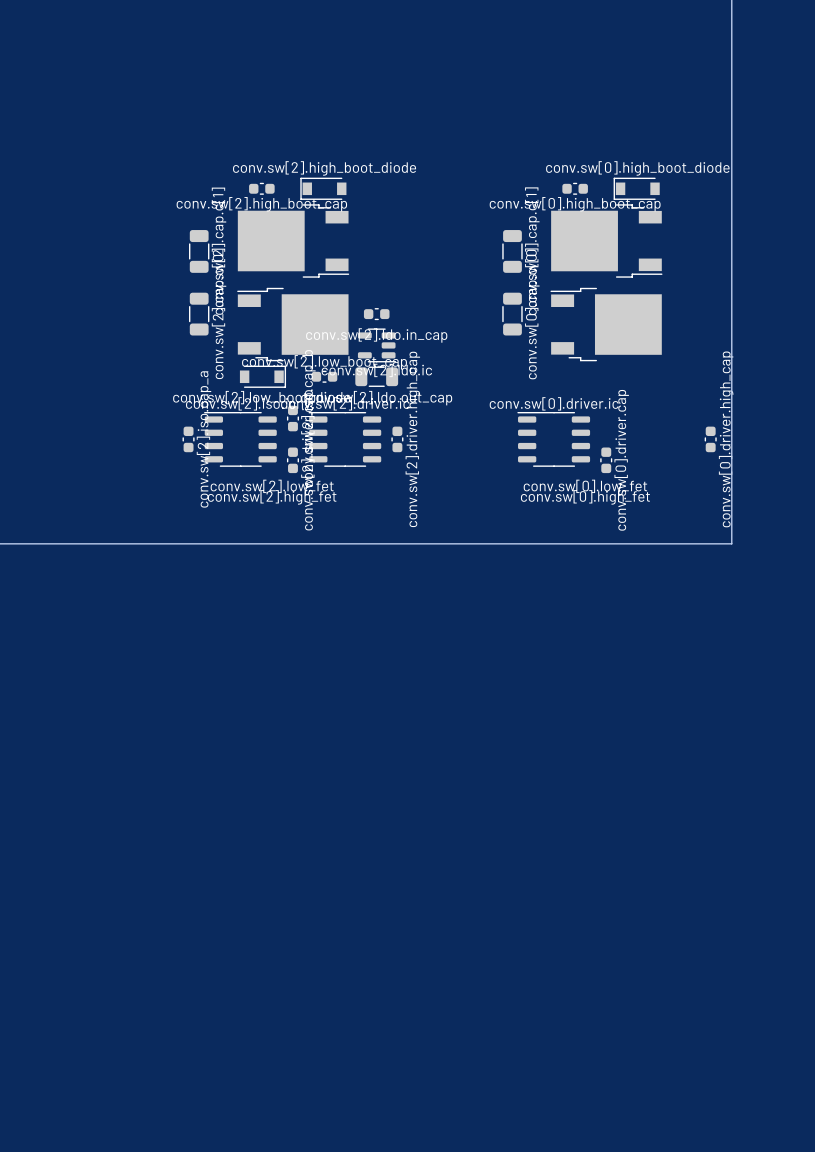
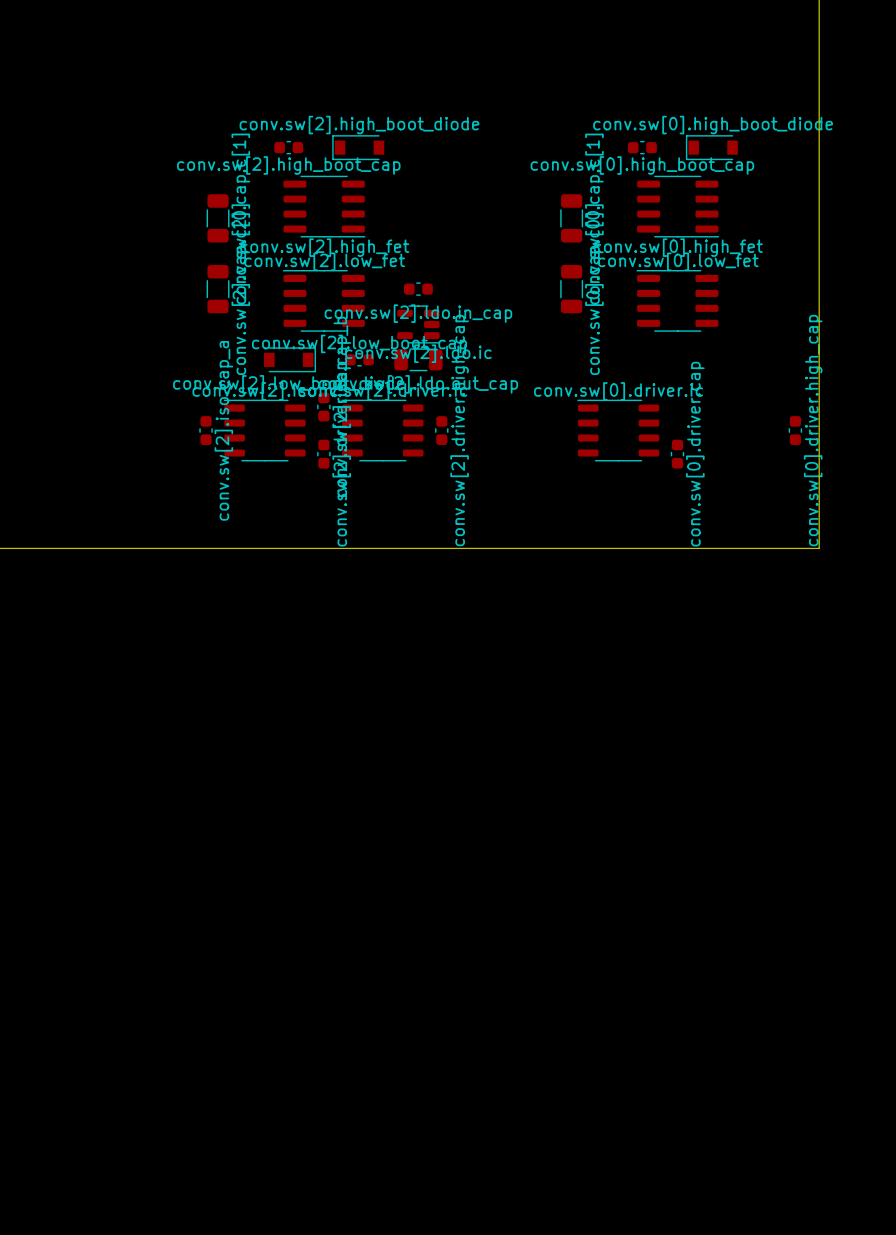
conv.sw[2].high_fet footprint: [237, 204, 350, 278] -> [283, 175, 366, 238]
conv.sw[0].high_fet footprint: [551, 204, 663, 278] -> [637, 175, 720, 238]
conv.sw[2].low_fet footprint: [237, 287, 349, 362] -> [282, 270, 365, 332]
conv.sw[0].low_fet footprint: [550, 287, 662, 362] -> [636, 270, 719, 332]
conv.sw[2].low_fet name position: conv.sw[2].low_fet (272, 486) -> conv.sw[2].low_fet (324, 261)
conv.sw[0].low_fet name position: conv.sw[0].low_fet (585, 486) -> conv.sw[0].low_fet (678, 261)
conv.sw[2].high_fet name position: conv.sw[2].high_fet (272, 497) -> conv.sw[2].high_fet (324, 247)
conv.sw[0].high_fet name position: conv.sw[0].high_fet (585, 497) -> conv.sw[0].high_fet (678, 247)

